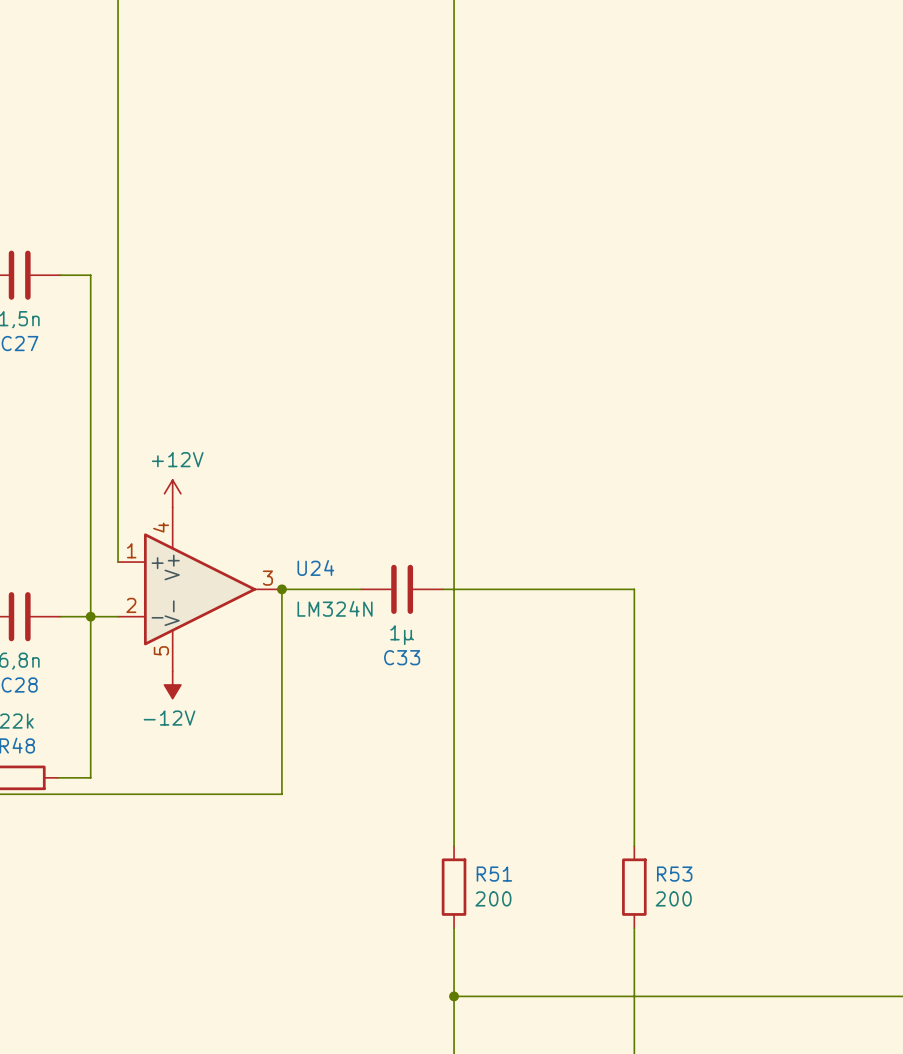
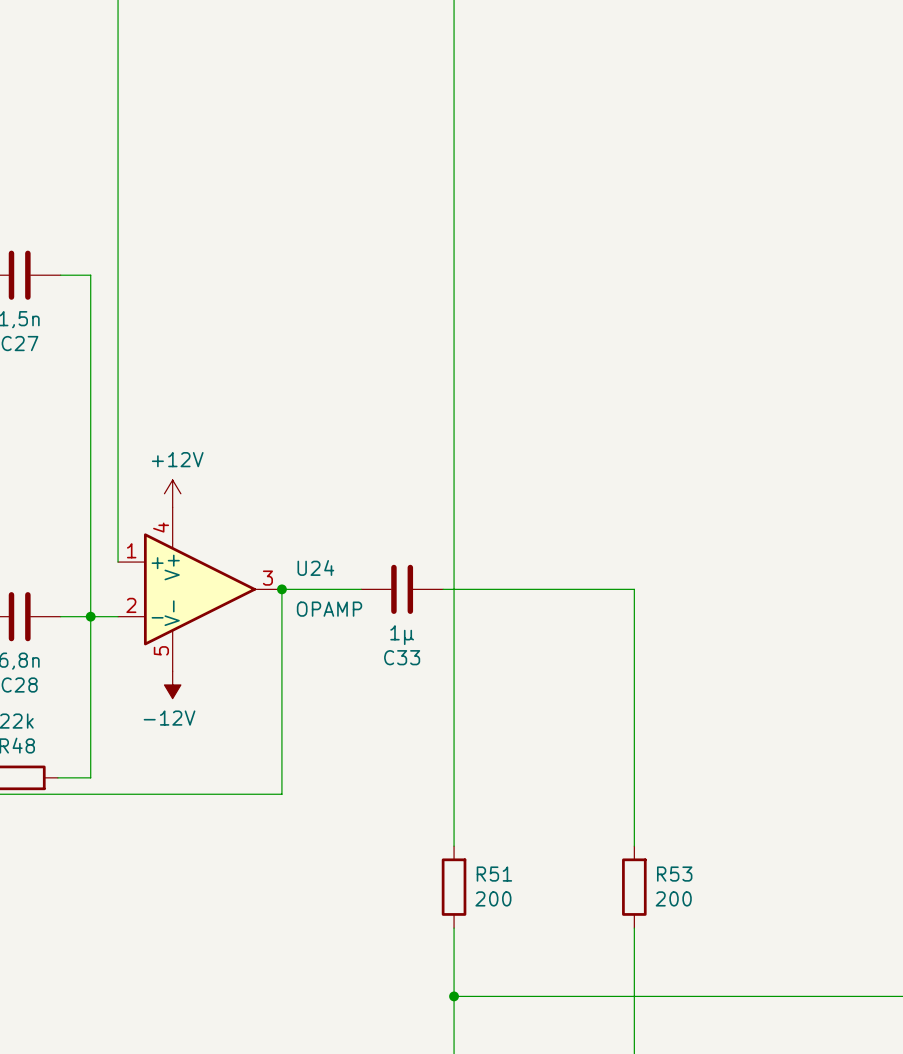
U24 value: LM324N (335, 608) -> OPAMP (329, 609)

